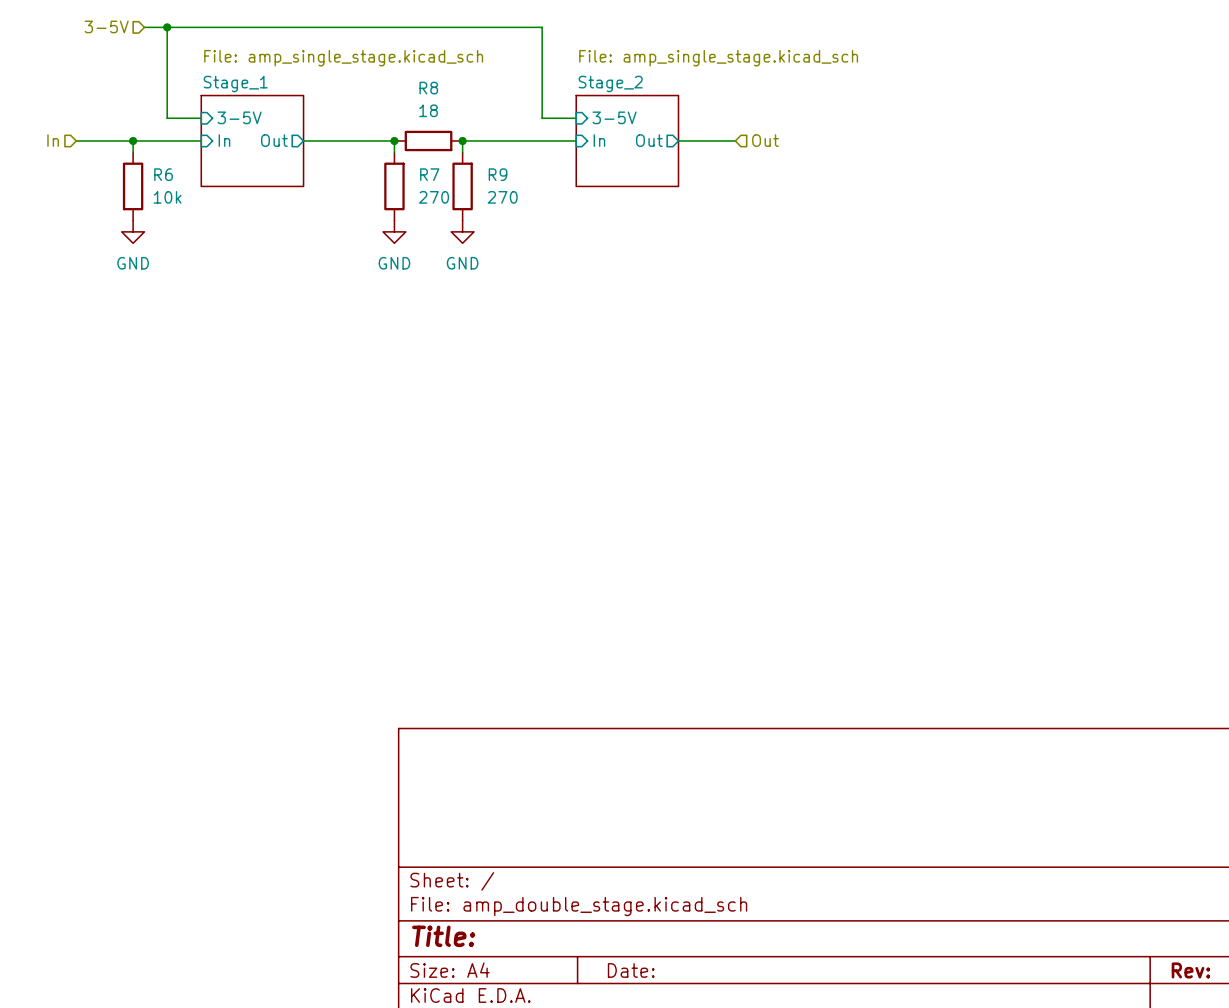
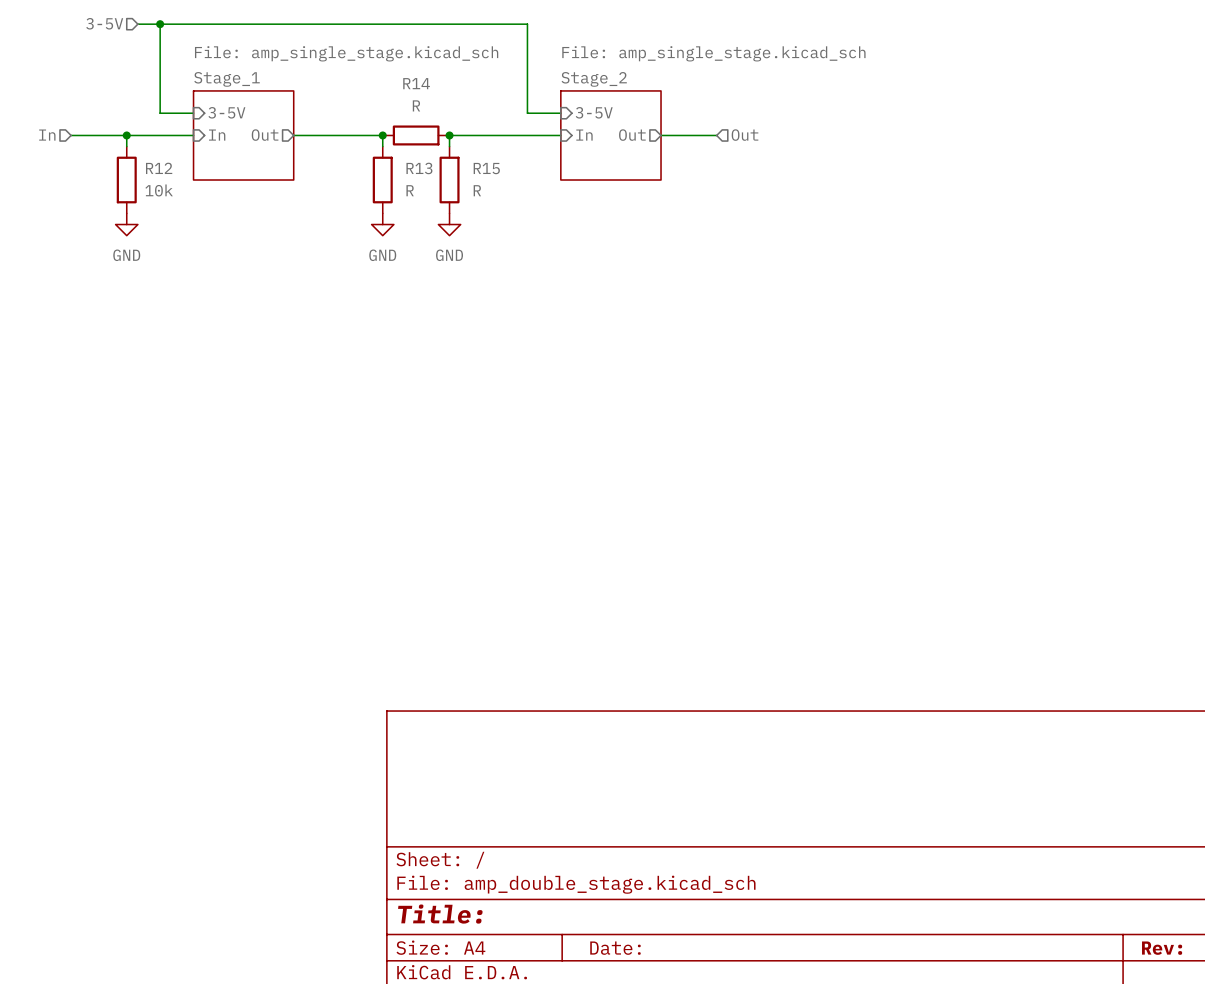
R8 name: R8 (428, 88) -> R14 (416, 83)
R8 value: 18 (428, 110) -> R (416, 105)
R6 name: R6 (163, 174) -> R12 (159, 168)
R7 name: R7 (429, 174) -> R13 (419, 168)
R9 name: R9 (498, 174) -> R15 (486, 168)
R7 value: 270 (434, 197) -> R (410, 190)
R9 value: 270 (502, 197) -> R (477, 190)

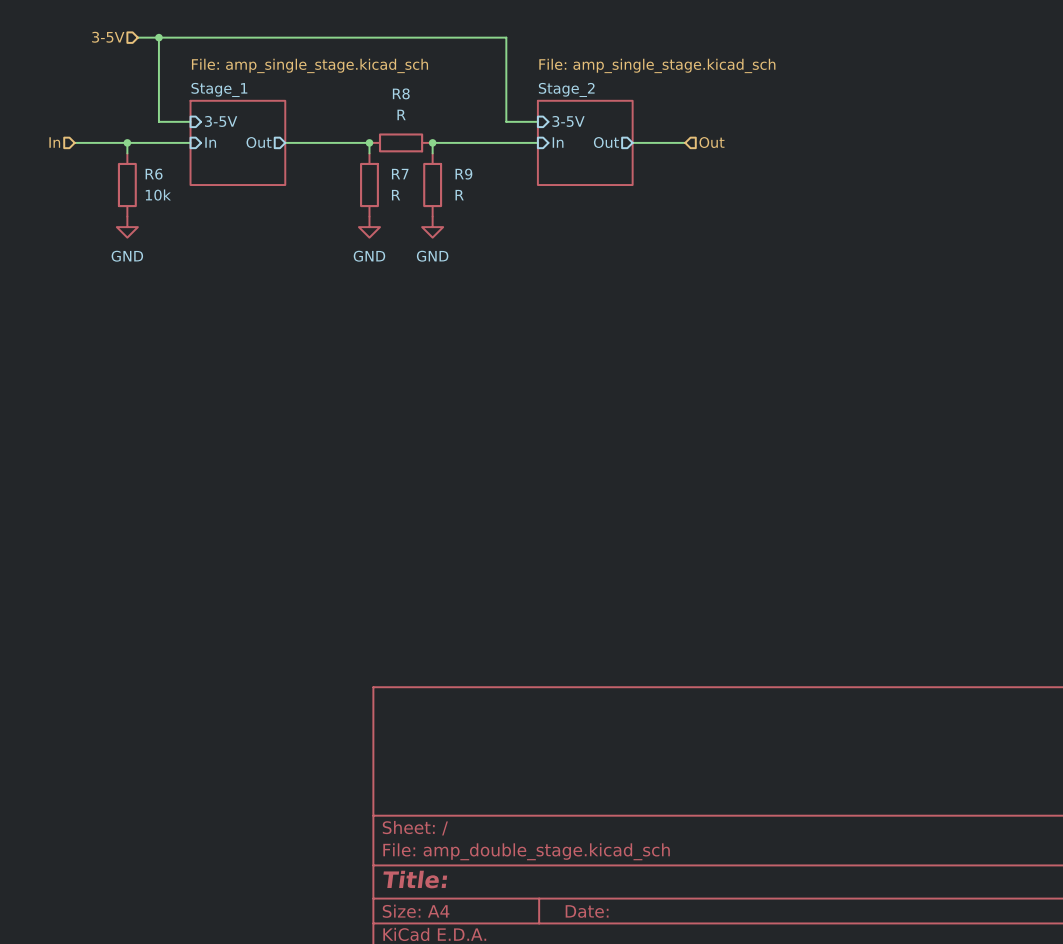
R14 name: R14 (416, 83) -> R8 (401, 93)
R12 name: R12 (159, 168) -> R6 (154, 174)
R13 name: R13 (419, 168) -> R7 (400, 174)
R15 name: R15 (486, 168) -> R9 (463, 174)

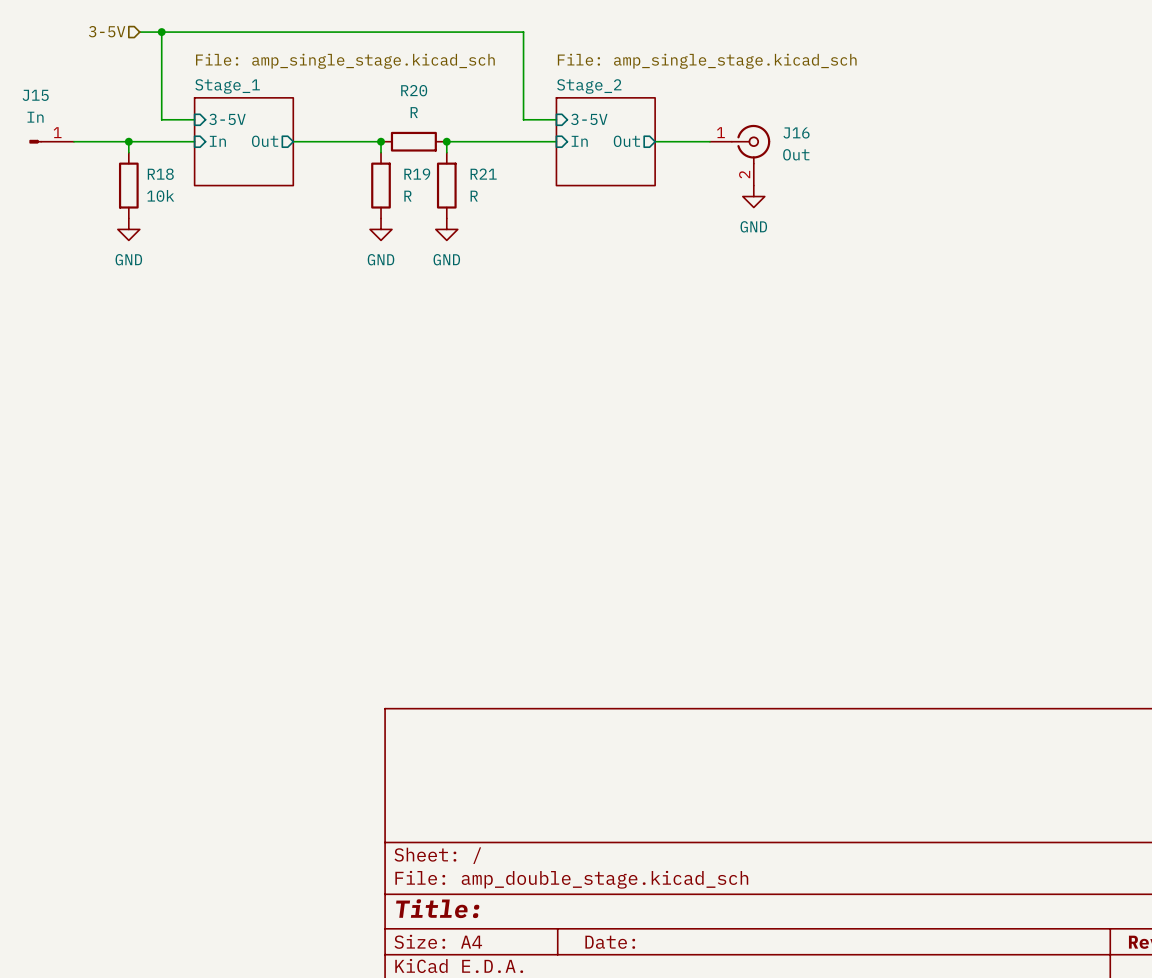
R8 name: R8 (401, 93) -> R20 (414, 90)
J15: none -> In (51, 141)
hierarchical label: In (54, 142) -> none
hierarchical label: Out (711, 142) -> none
J16: none -> Out (740, 155)
R6 name: R6 (154, 174) -> R18 (160, 174)
R7 name: R7 (400, 174) -> R19 (417, 174)
R9 name: R9 (463, 174) -> R21 (483, 174)
power symbol: none -> GND (753, 196)

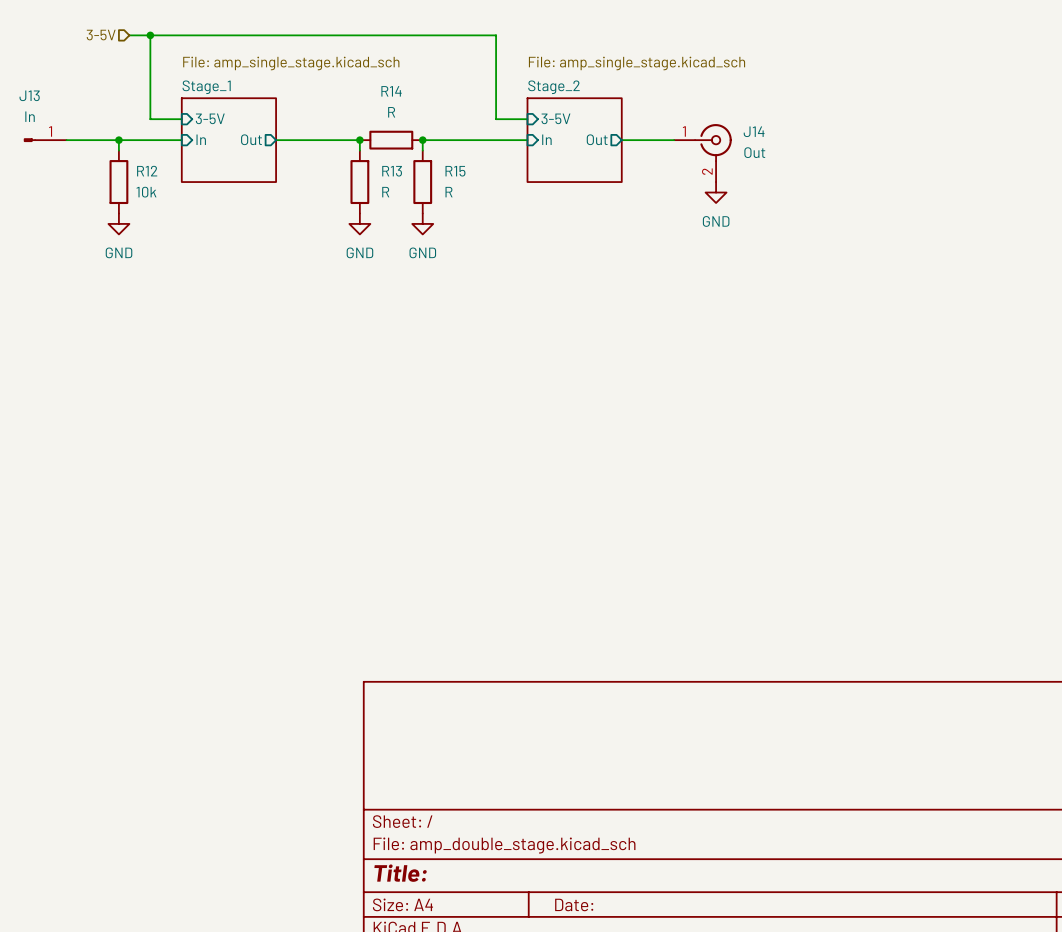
R20 name: R20 (414, 90) -> R14 (391, 91)
J15 name: J15 (35, 95) -> J13 (29, 95)
J16 name: J16 (796, 132) -> J14 (754, 131)
R18 name: R18 (160, 174) -> R12 (147, 171)
R19 name: R19 (417, 174) -> R13 (392, 171)
R21 name: R21 (483, 174) -> R15 (455, 171)

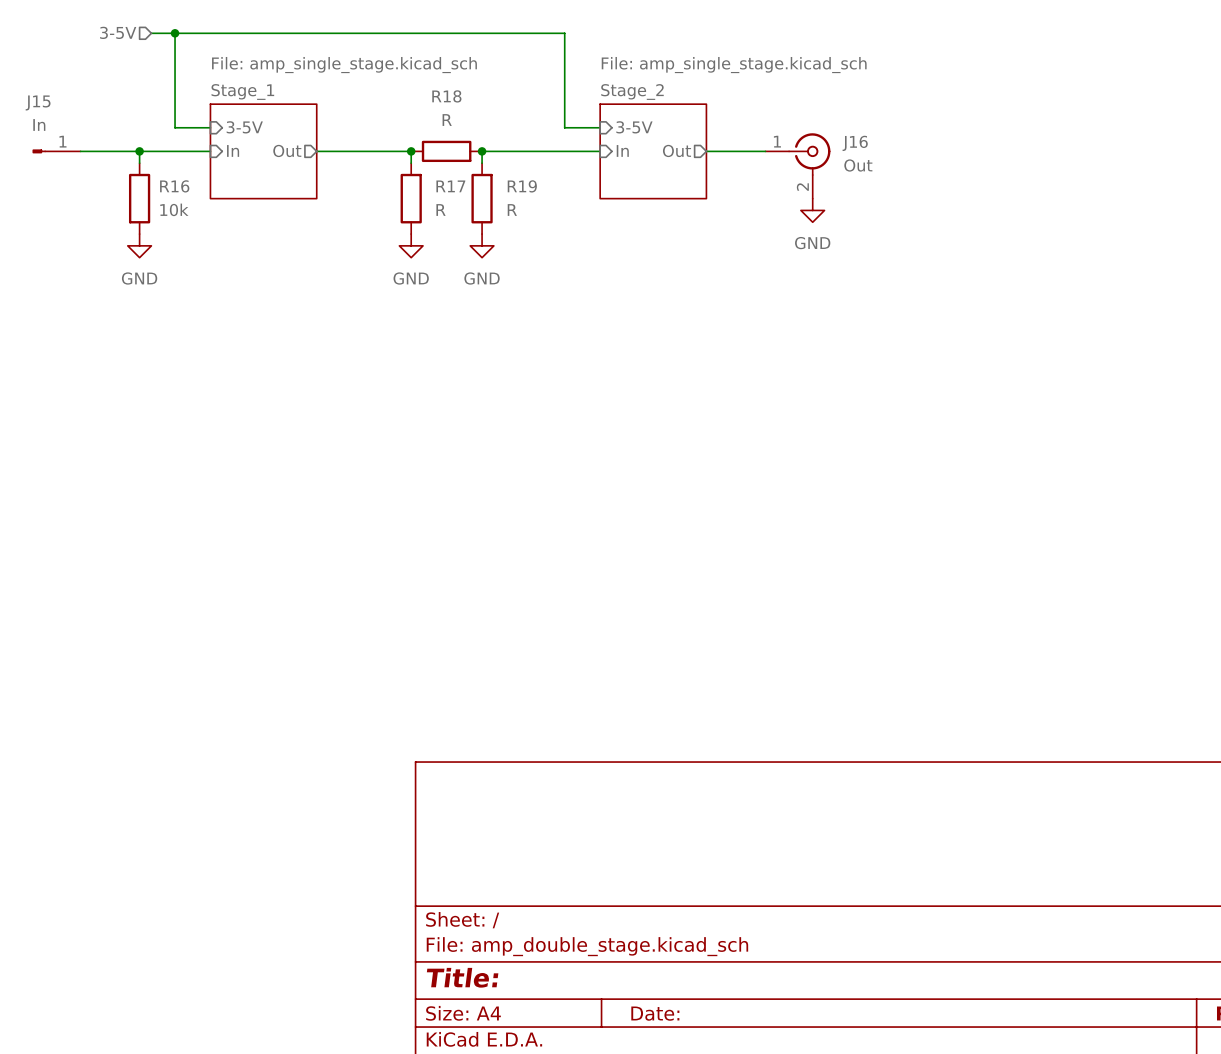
R14 name: R14 (391, 91) -> R18 (446, 96)
J13 name: J13 (29, 95) -> J15 (38, 102)
J14 name: J14 (754, 131) -> J16 (855, 143)
R12 name: R12 (147, 171) -> R16 (174, 186)
R13 name: R13 (392, 171) -> R17 (450, 186)
R15 name: R15 (455, 171) -> R19 (522, 186)

